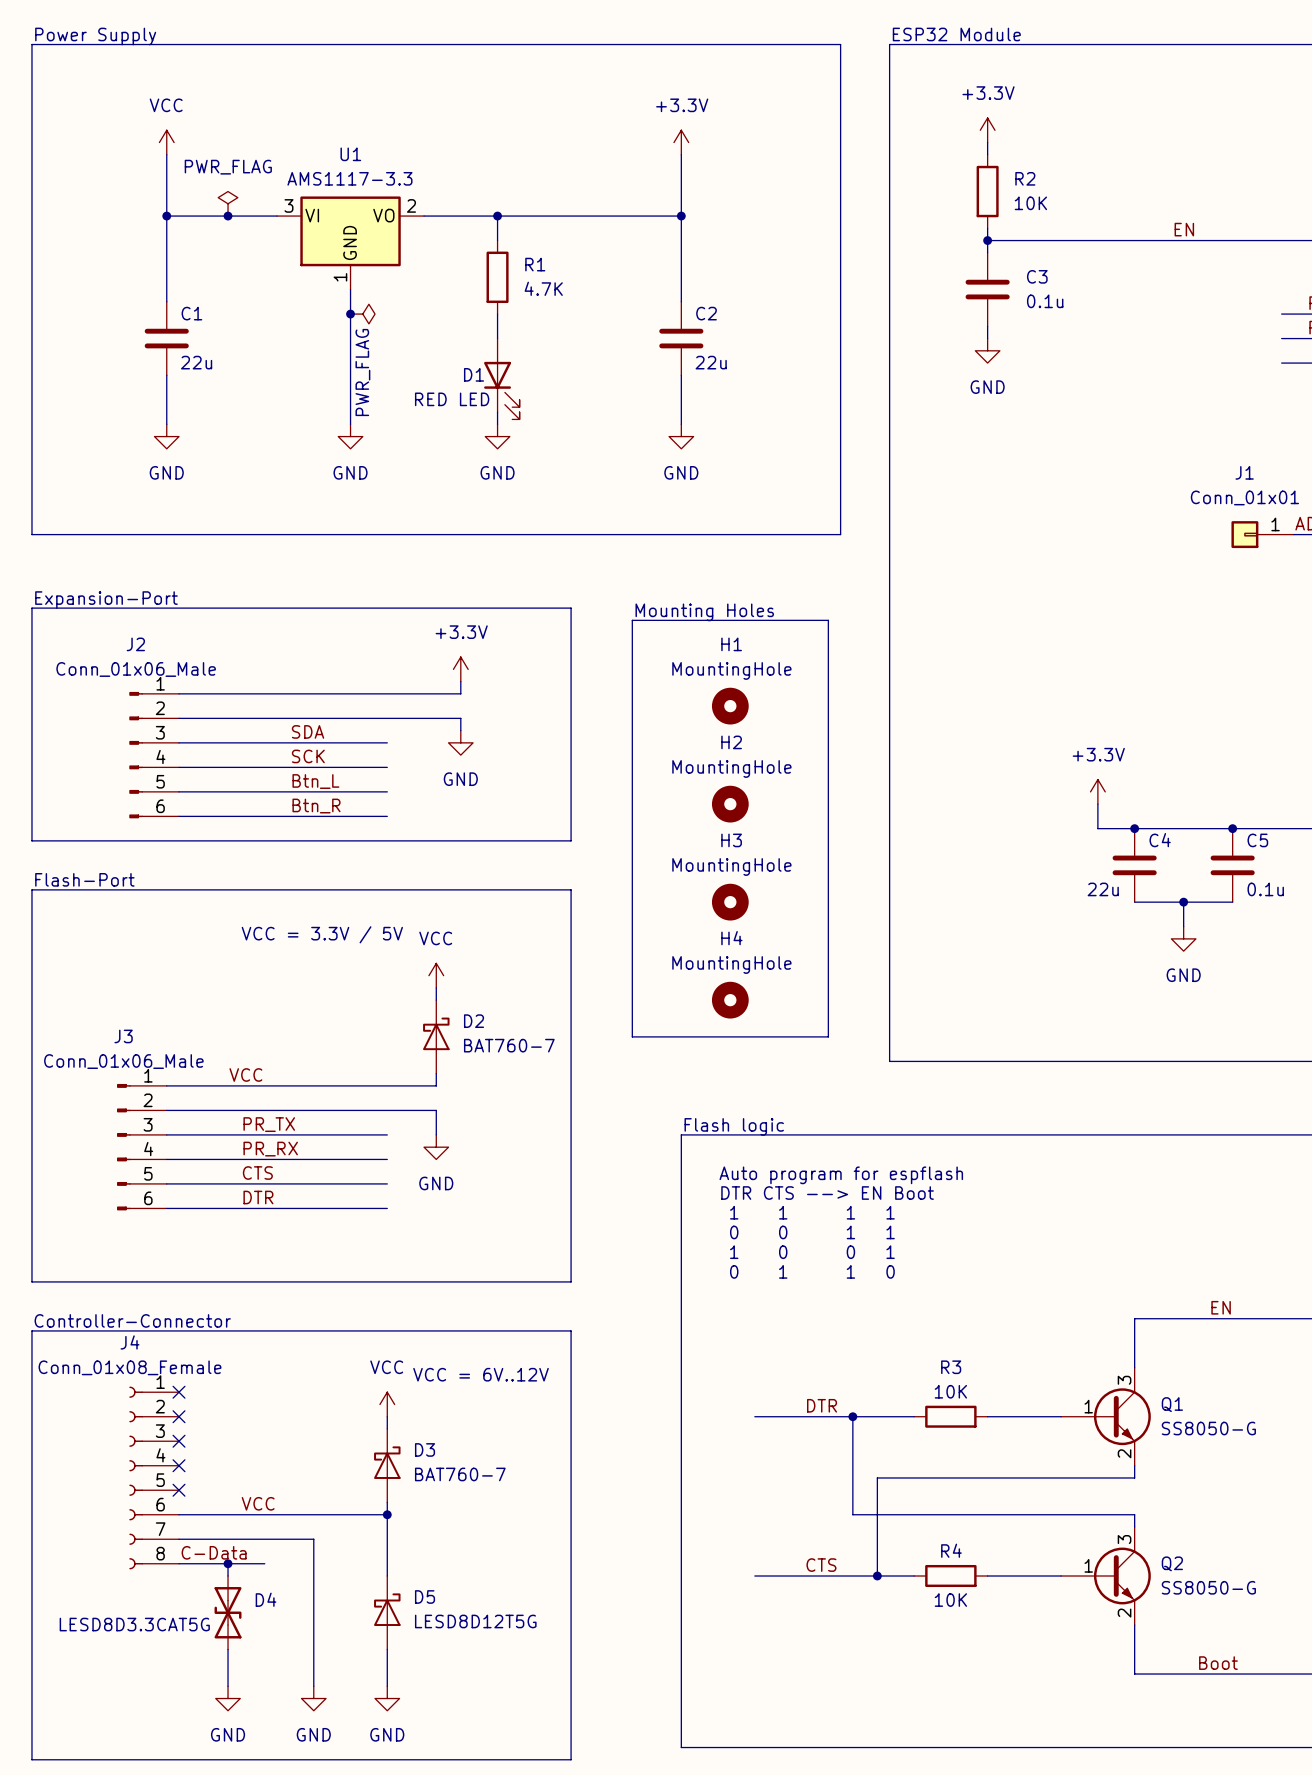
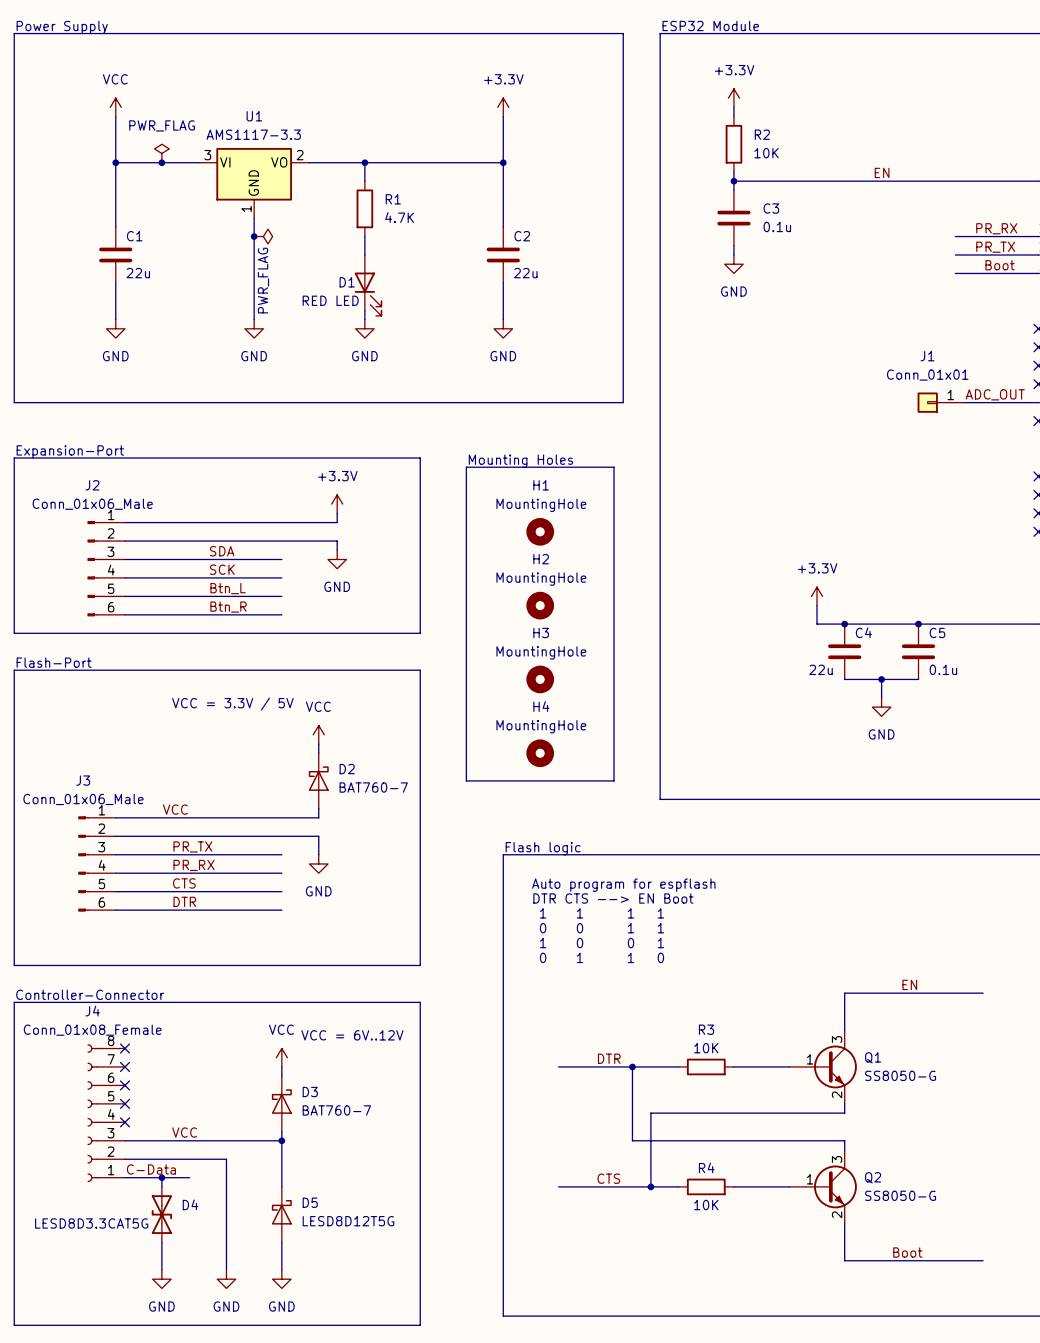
J4 flip: as is (136, 1477) -> up-down (92, 1113)

